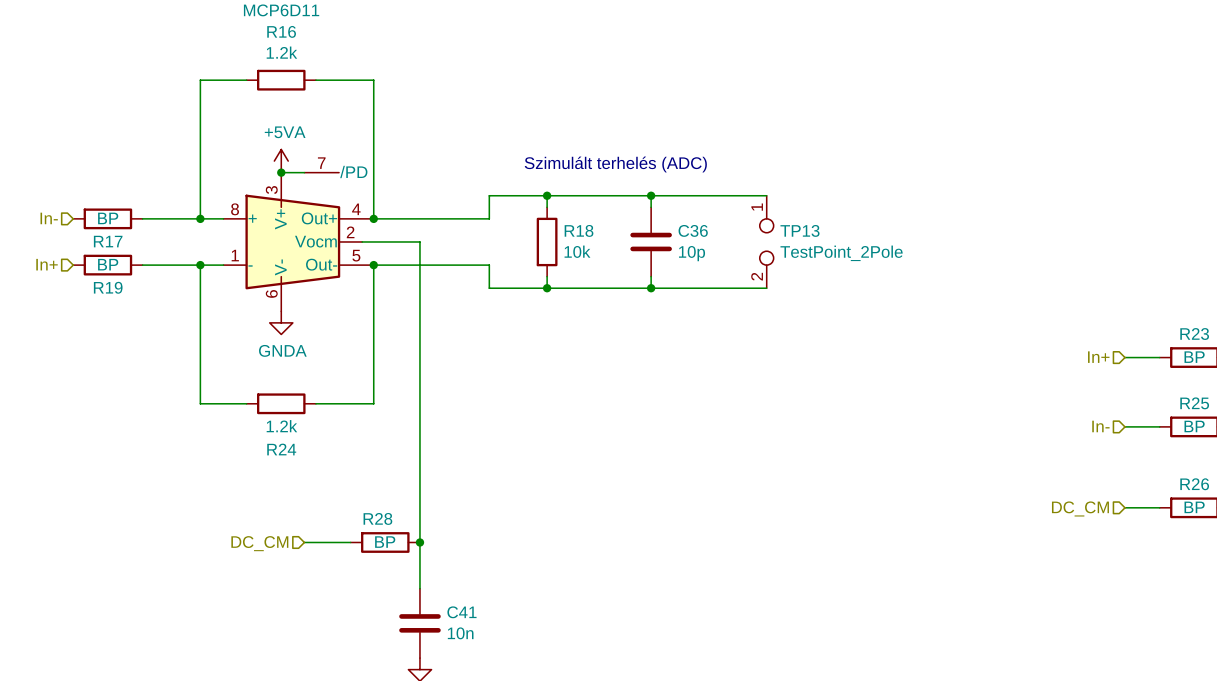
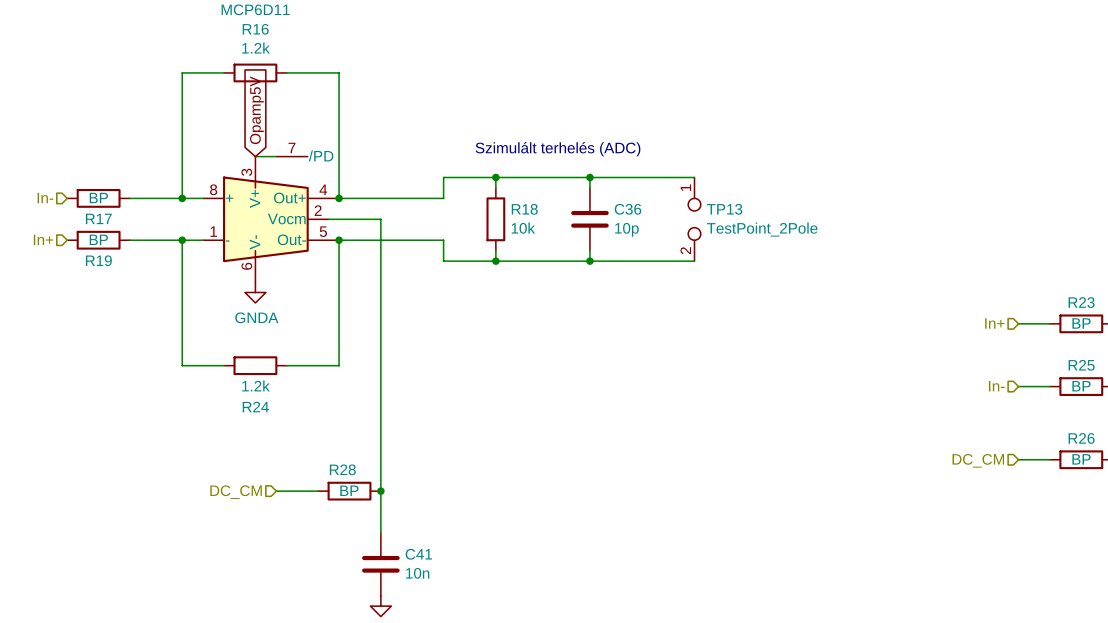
global label: none -> Opamp5V (256, 110)
power symbol: +5VA (281, 161) -> none
junction: (281, 172) -> none

